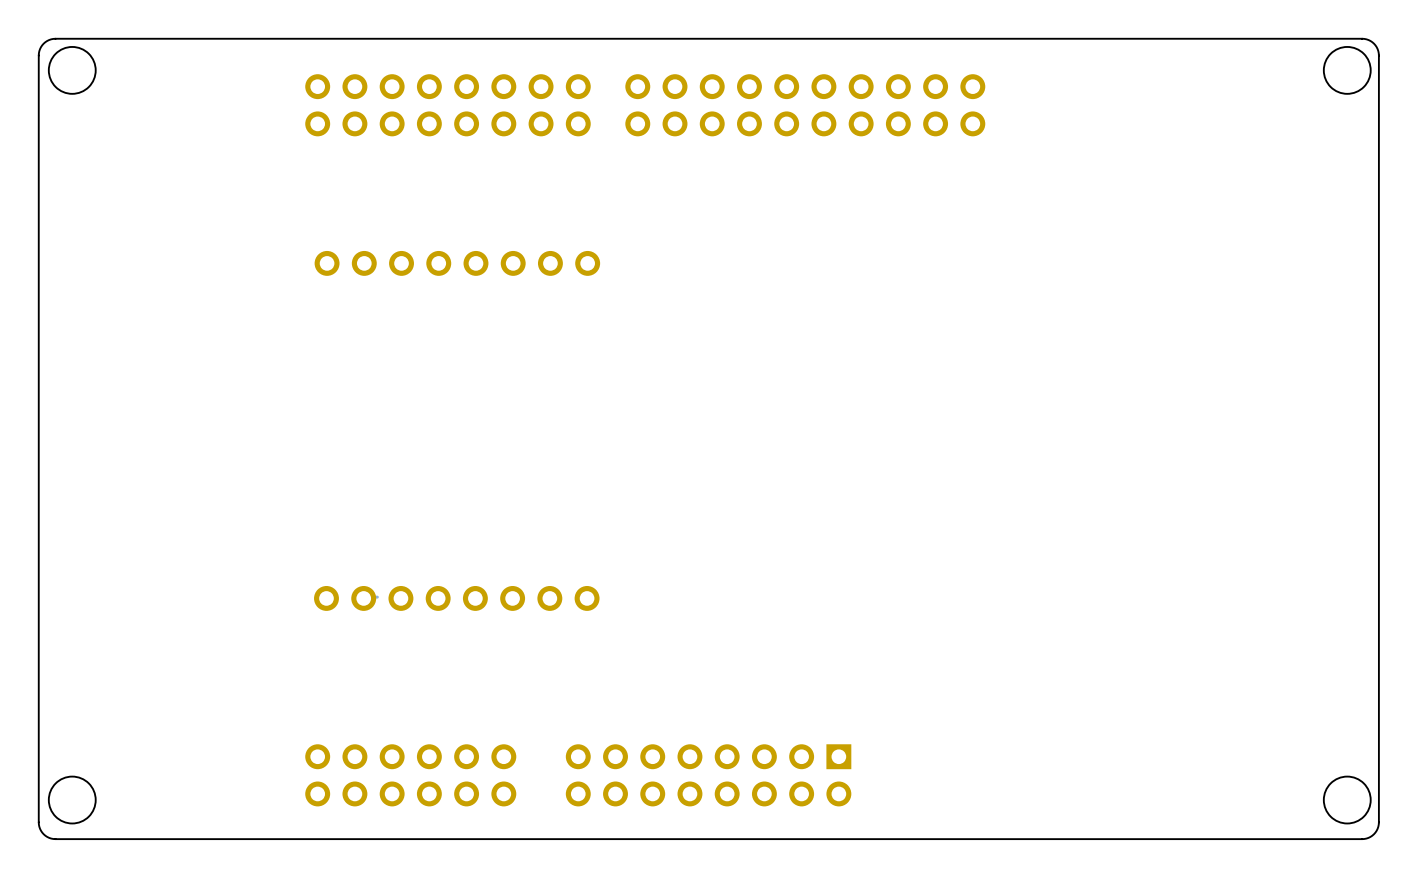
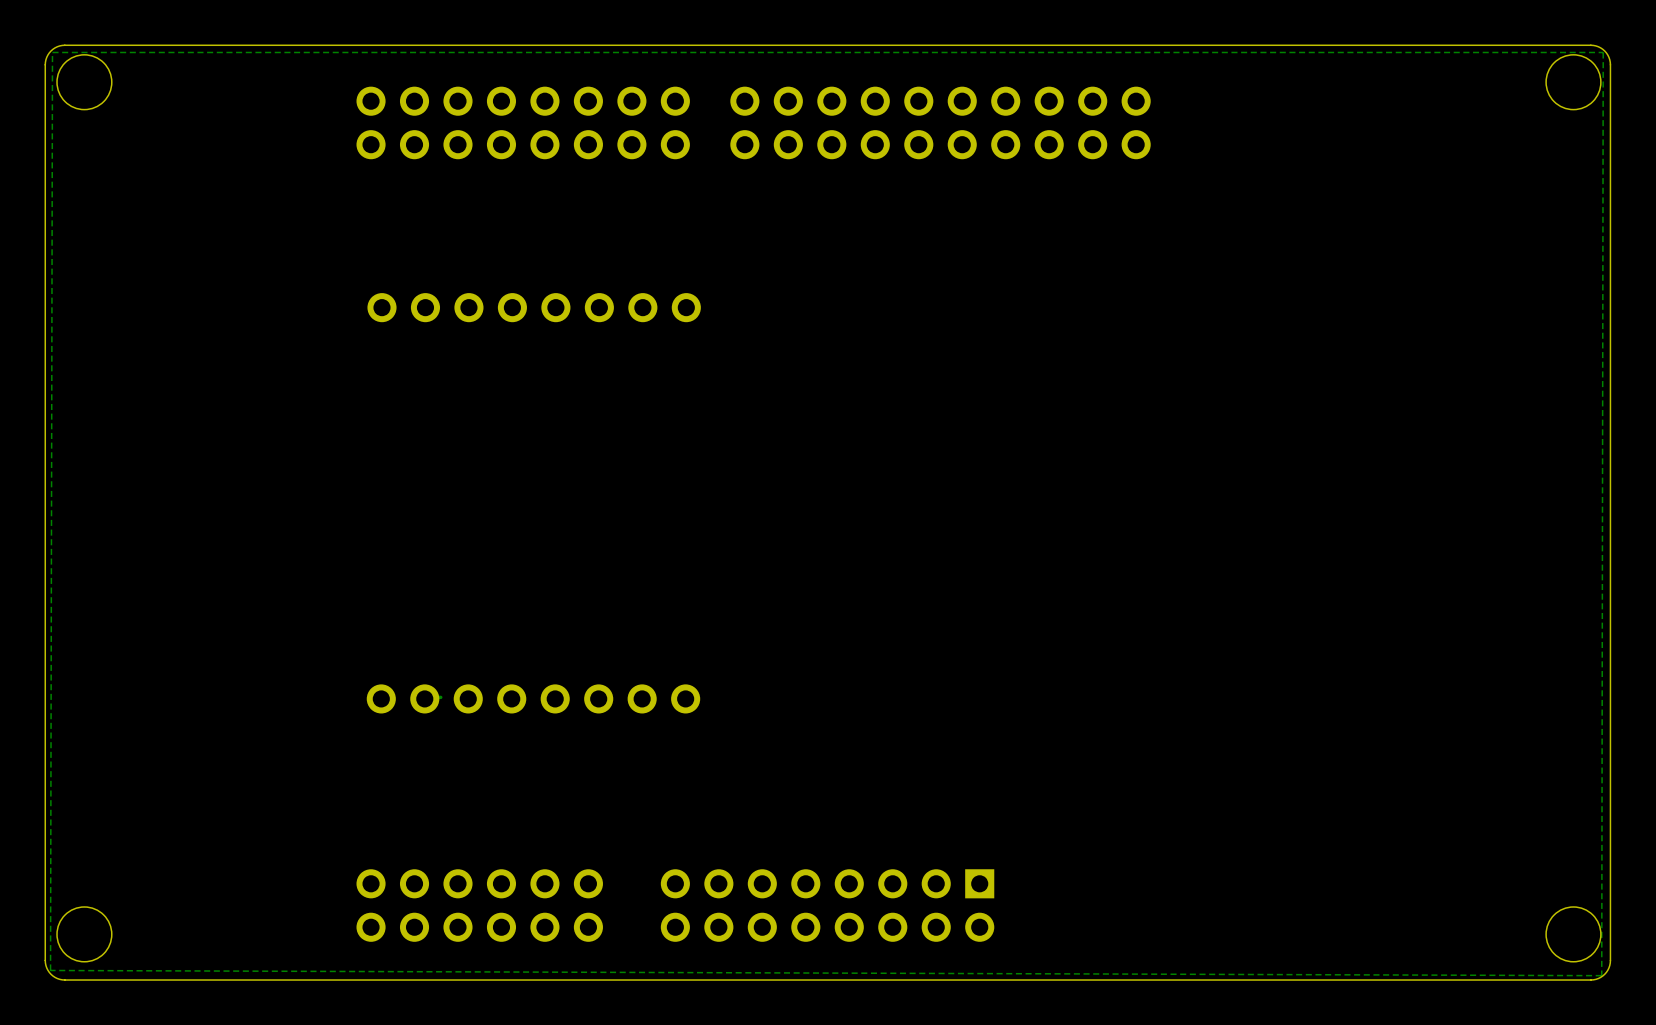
zone outline: none -> (1603, 52) (52, 52) (50, 970) (1601, 975) (1603, 52)

